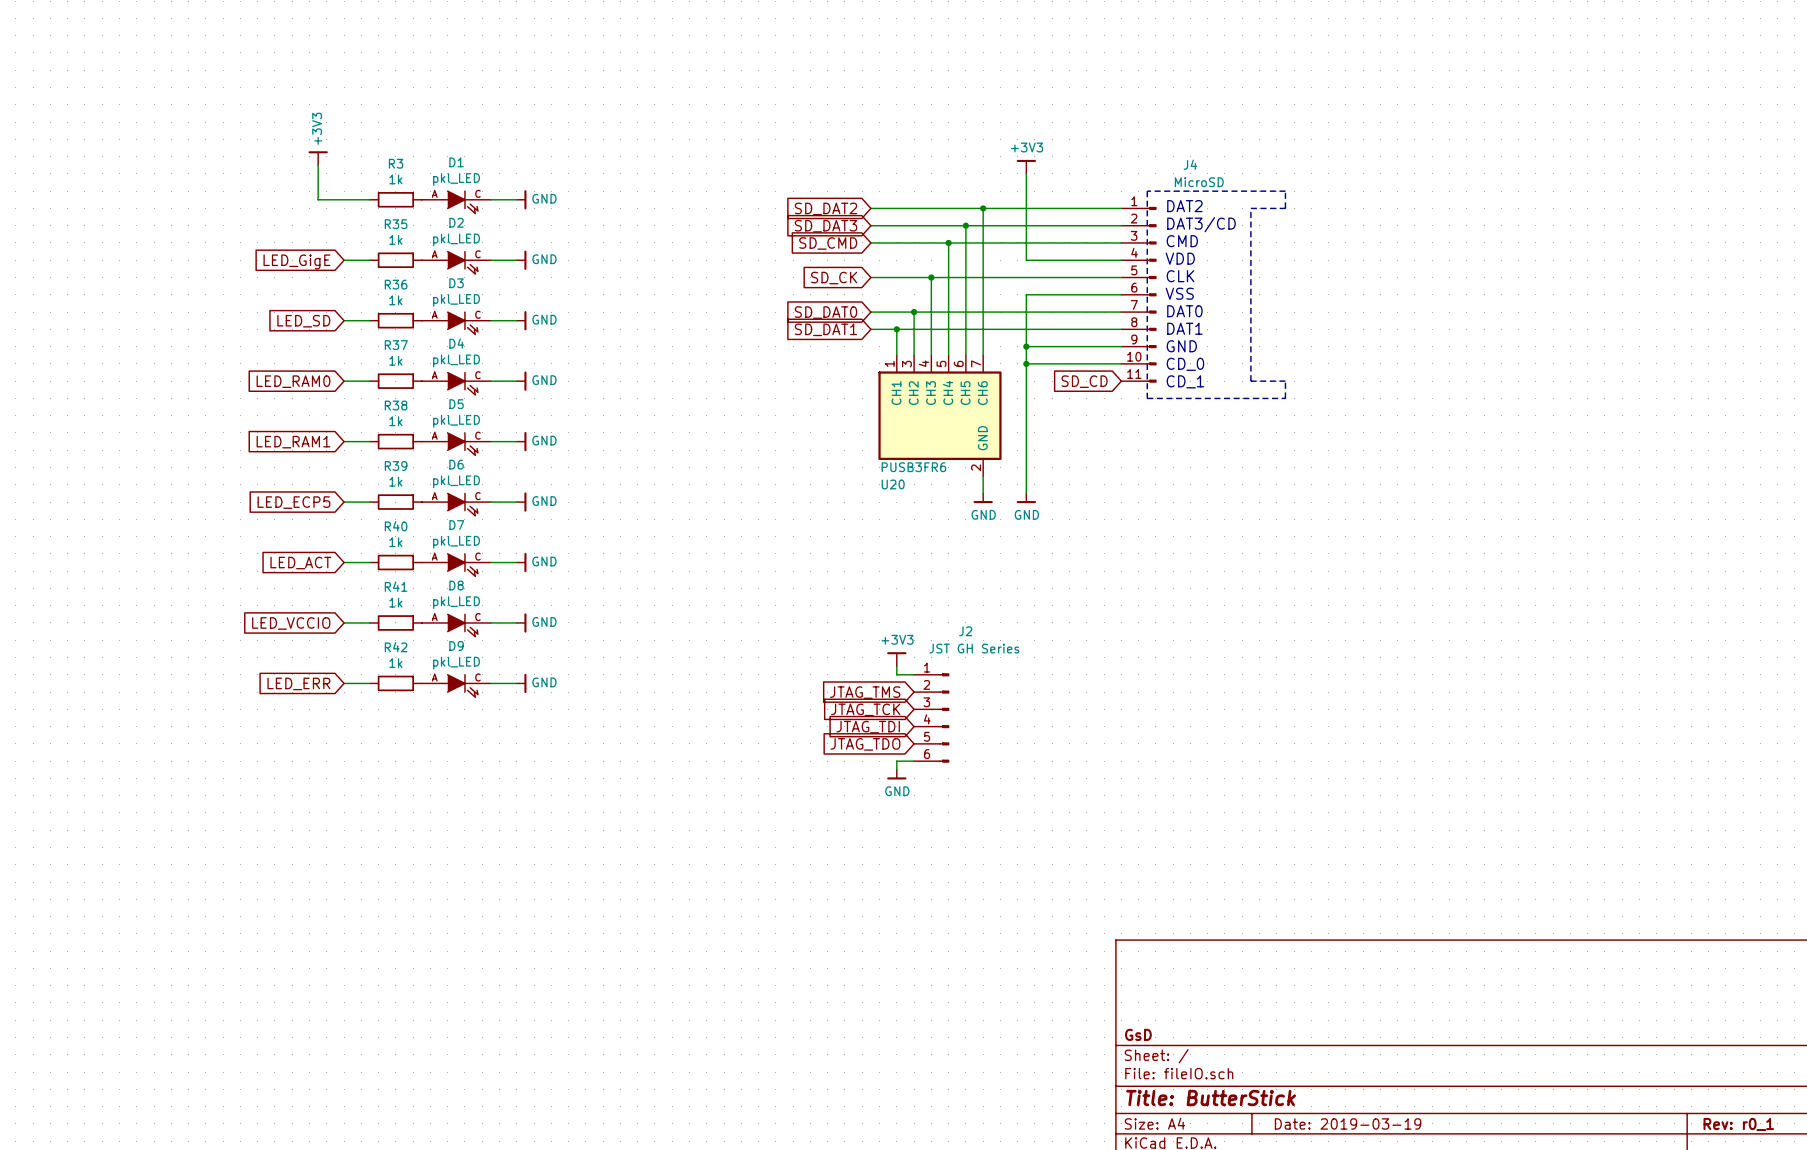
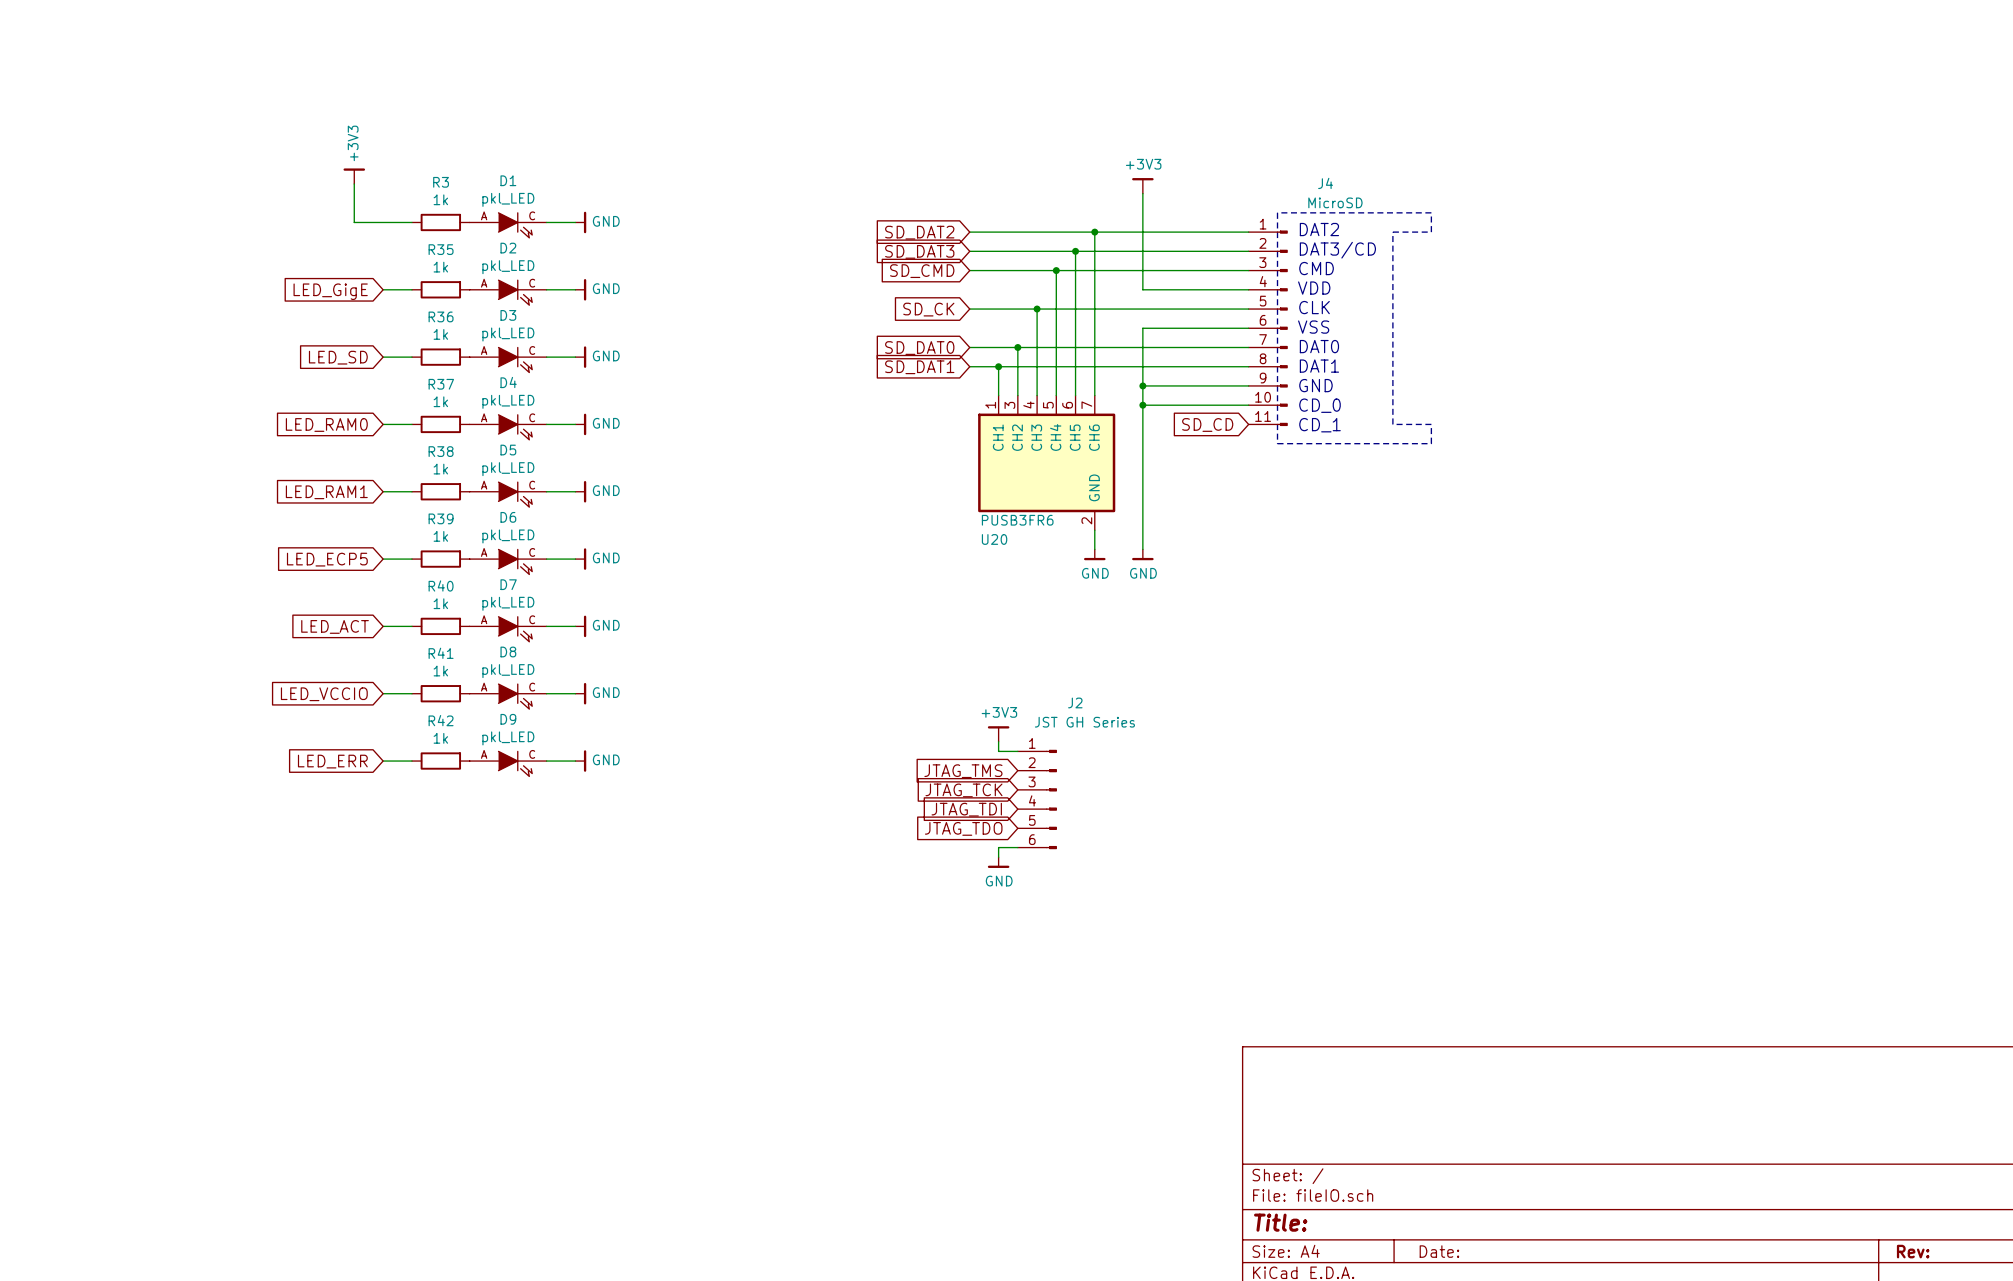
title block: GsD (1138, 1034) -> none
title block: Title: ButterStick (1211, 1098) -> Title: (1280, 1222)
title block: Date: 2019-03-19 (1348, 1123) -> Date: (1439, 1251)
title block: Rev: r0_1 (1738, 1124) -> Rev: (1913, 1251)

